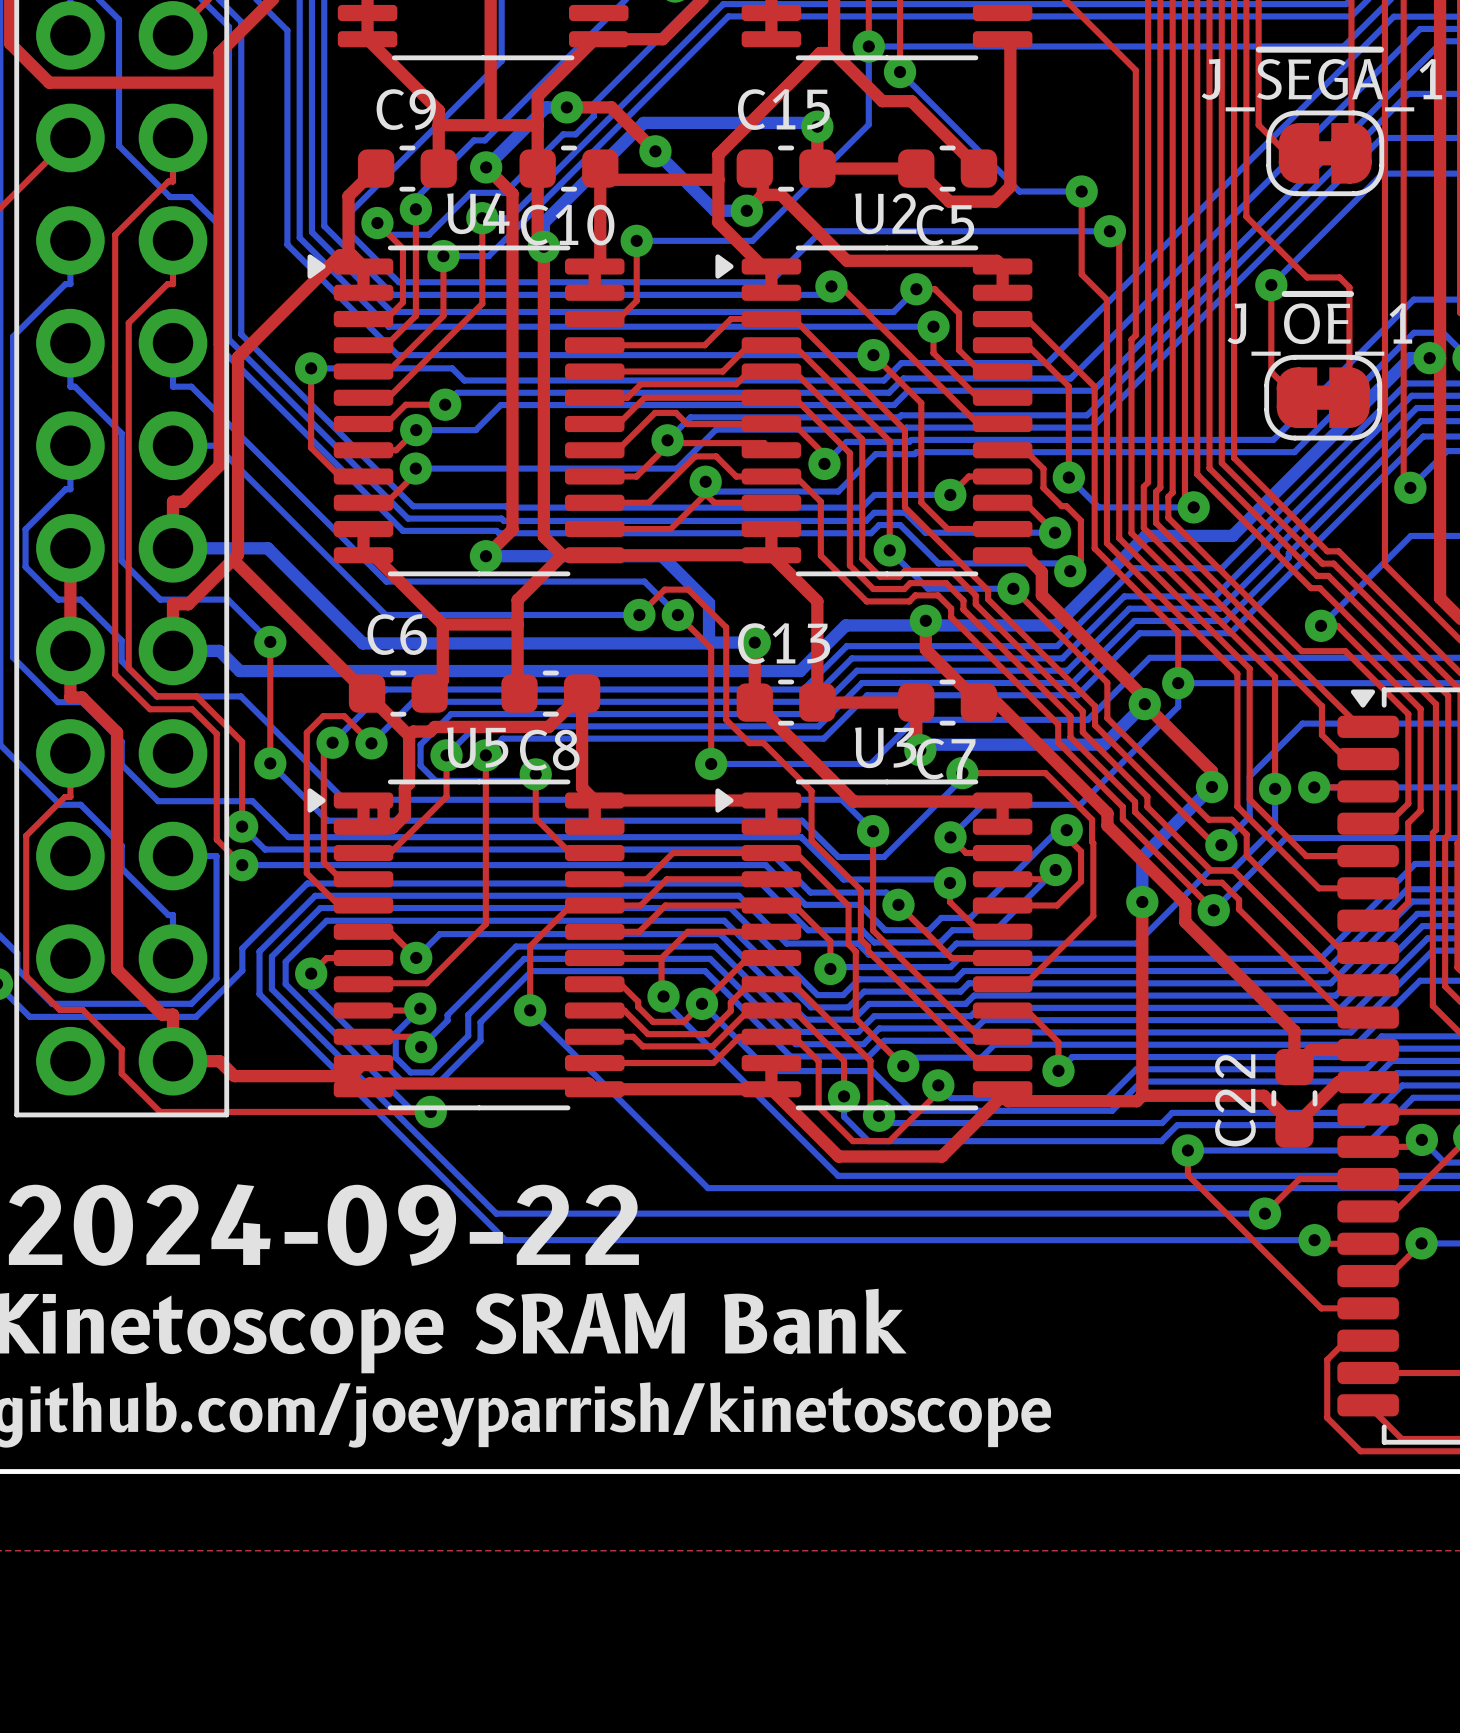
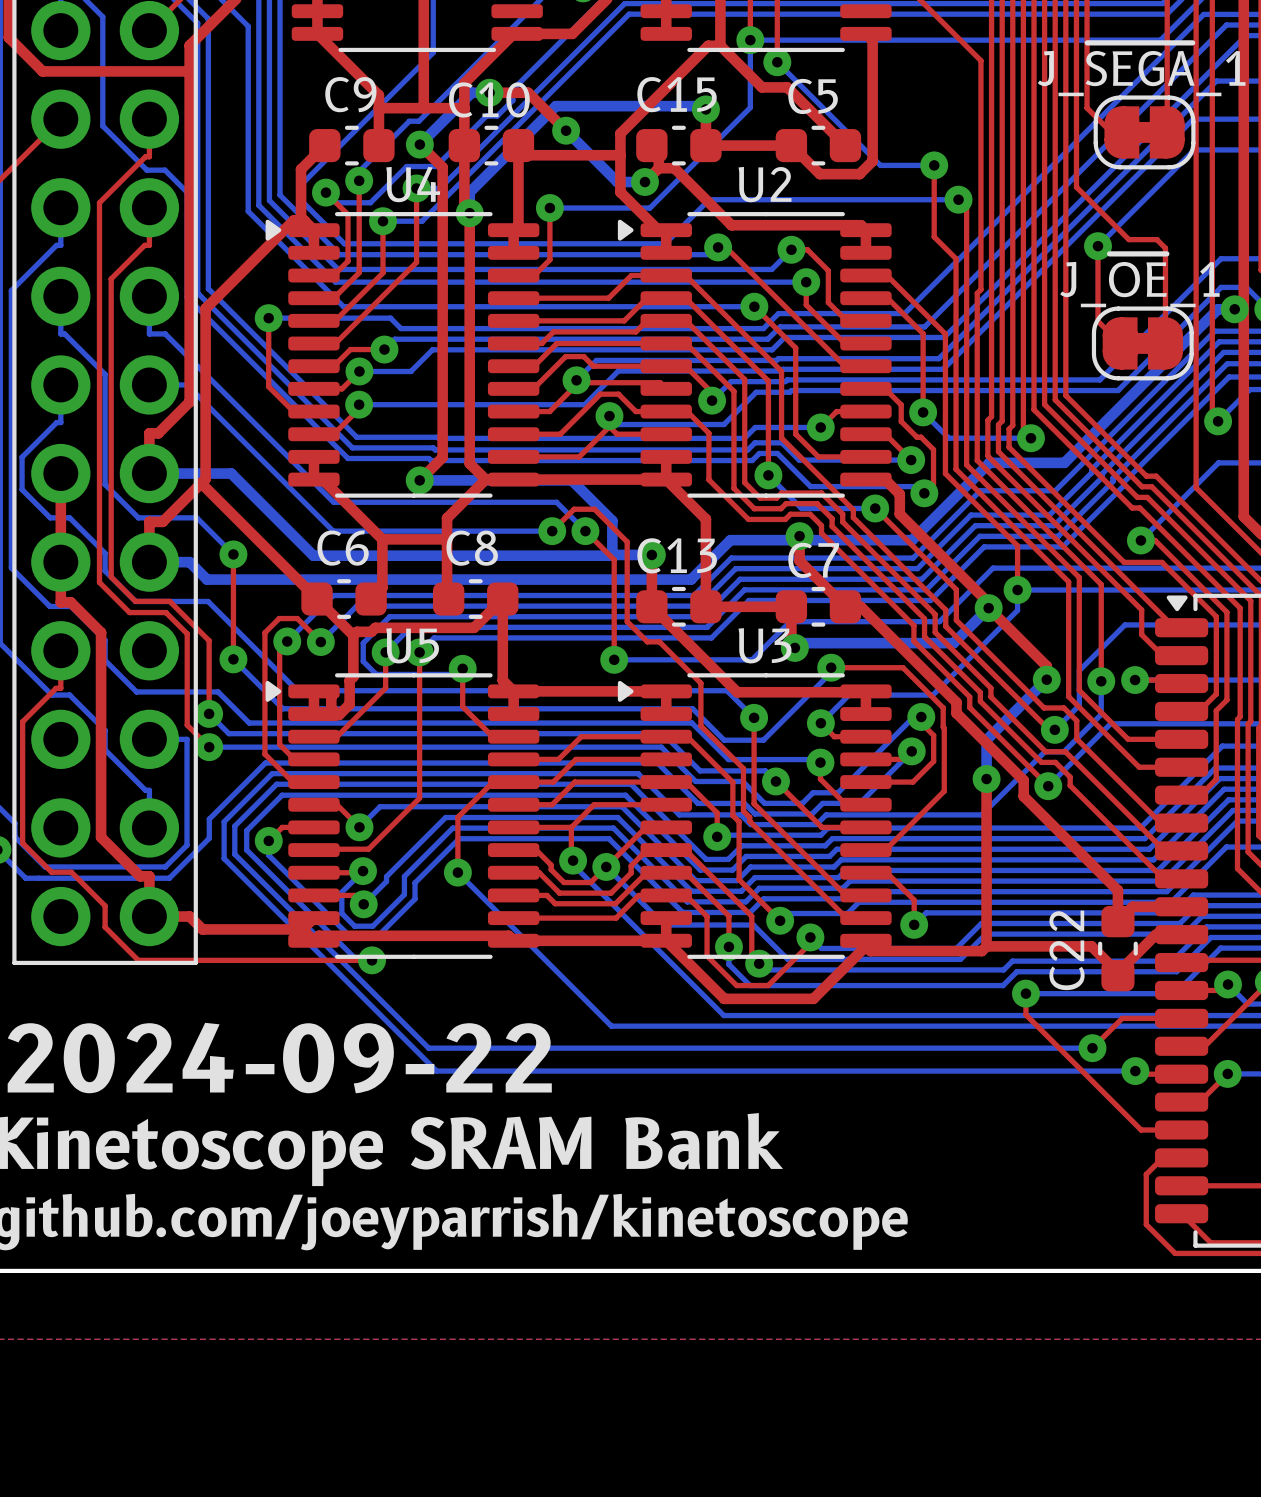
C10 name position: C10 (567, 225) -> C10 (489, 99)
C5 name position: C5 (945, 225) -> C5 (813, 96)
C8 name position: C8 (549, 750) -> C8 (472, 548)
C7 name position: C7 (946, 759) -> C7 (813, 560)

